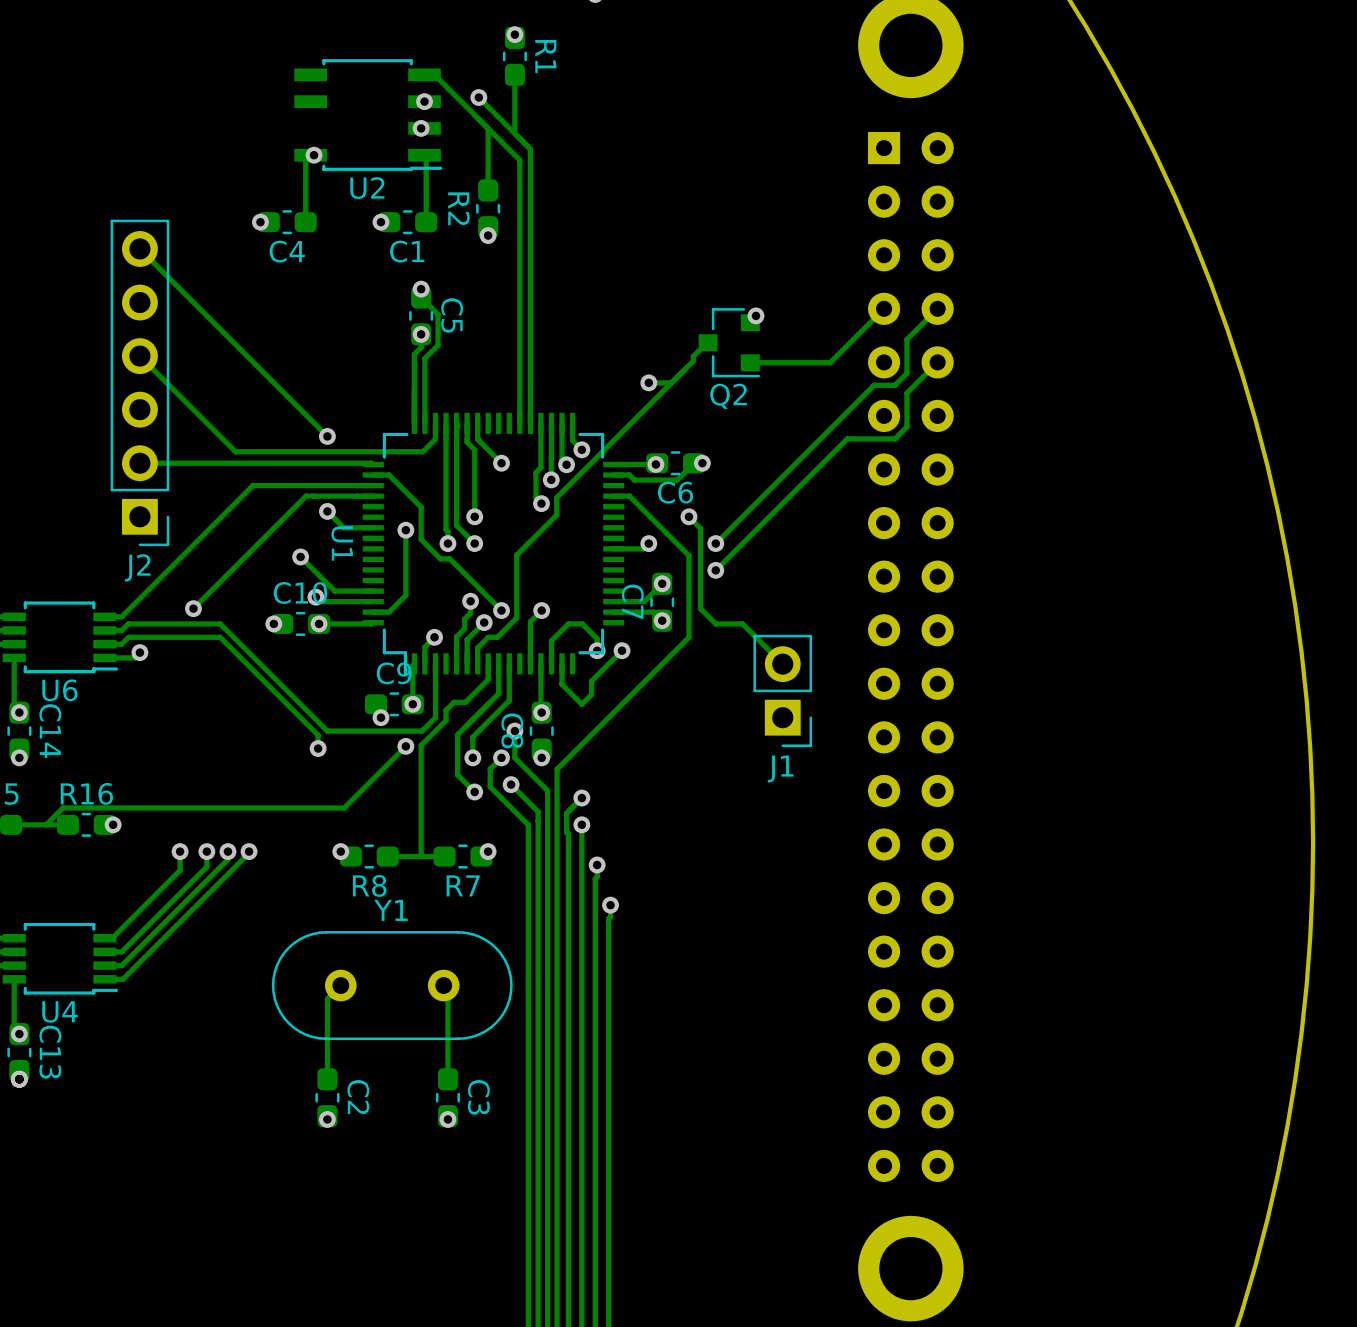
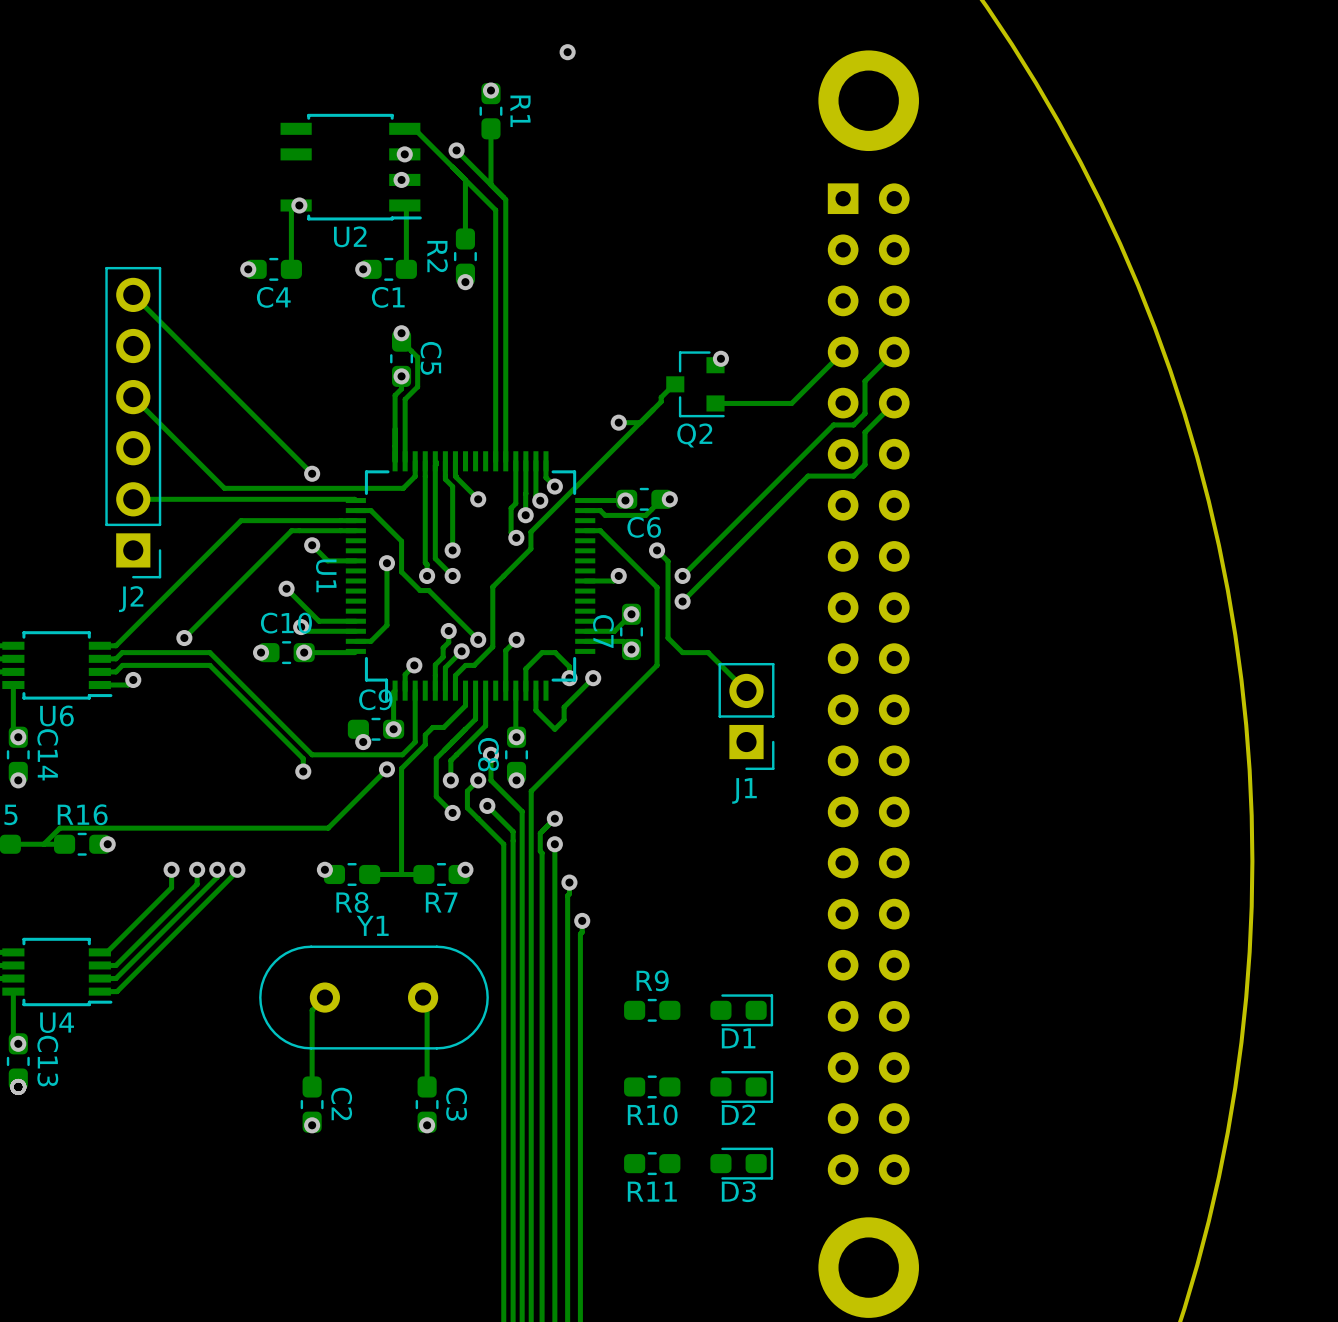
R9: none -> (652, 1010)
D1: none -> (741, 1010)
R10: none -> (652, 1086)
D2: none -> (741, 1086)
R11: none -> (652, 1163)
D3: none -> (741, 1163)

